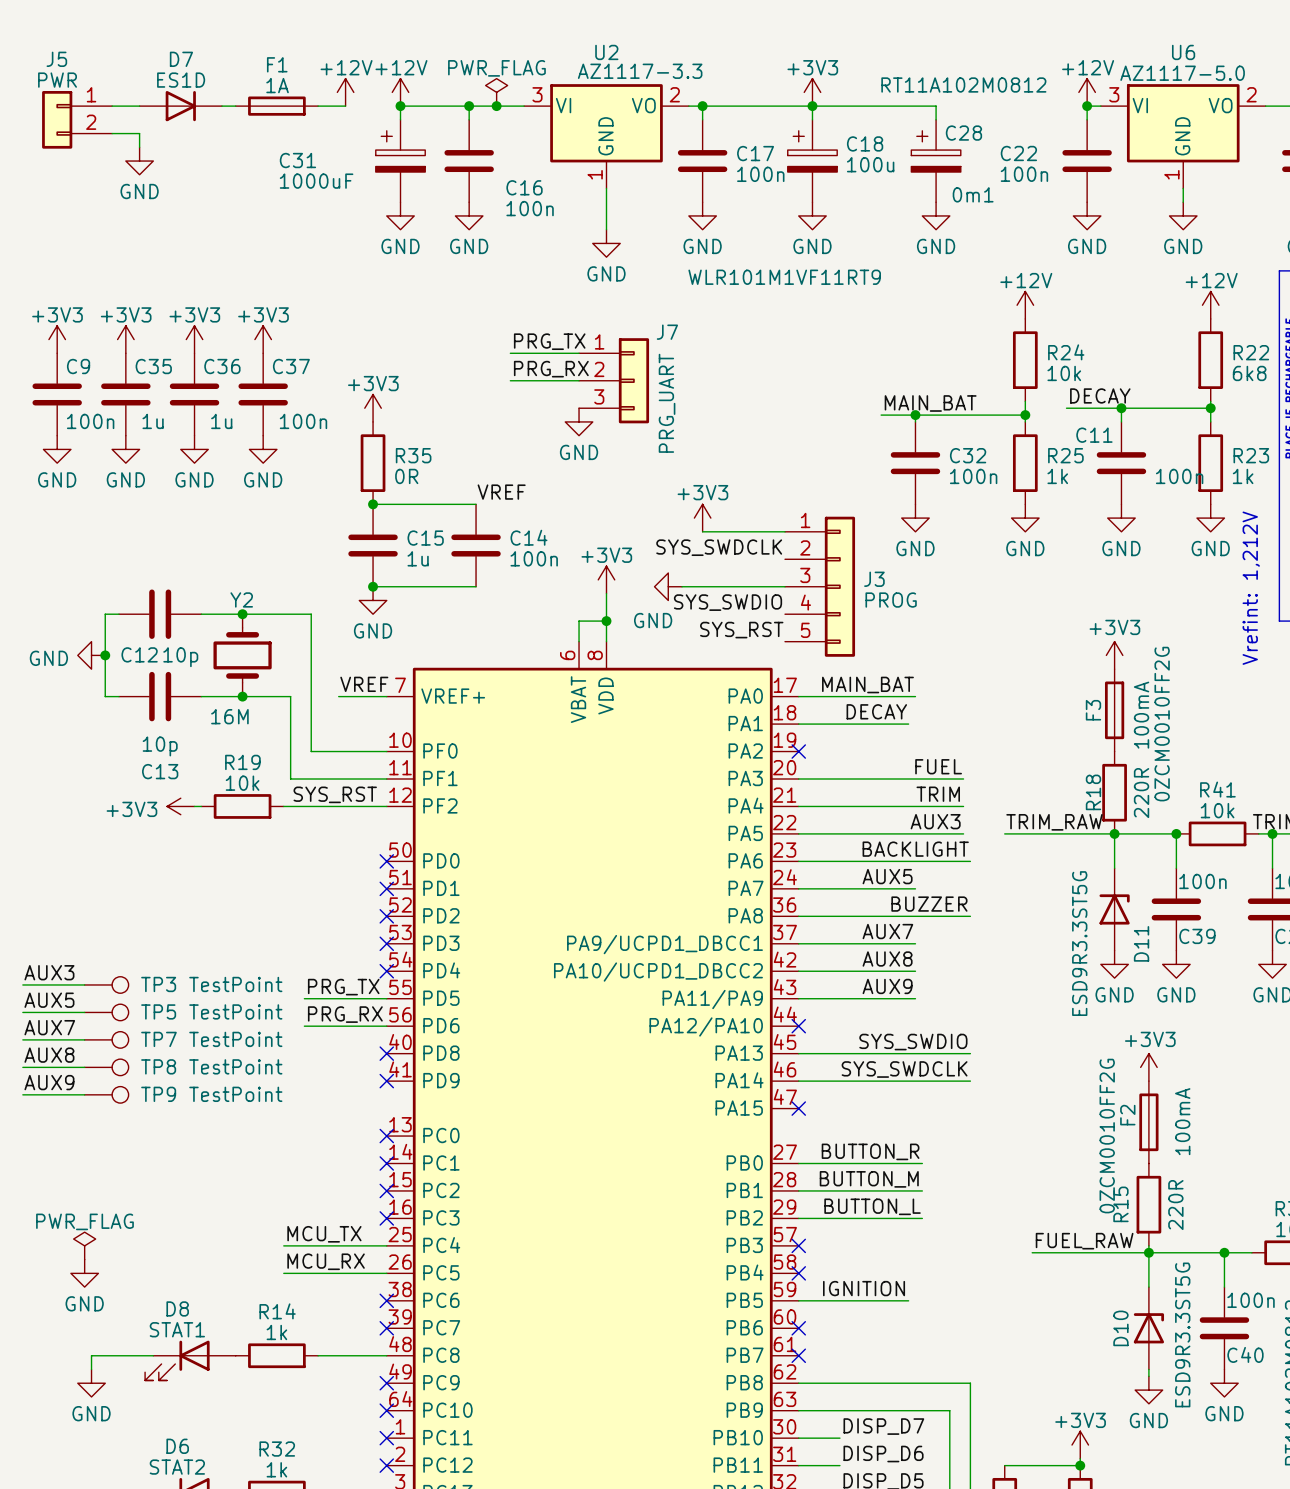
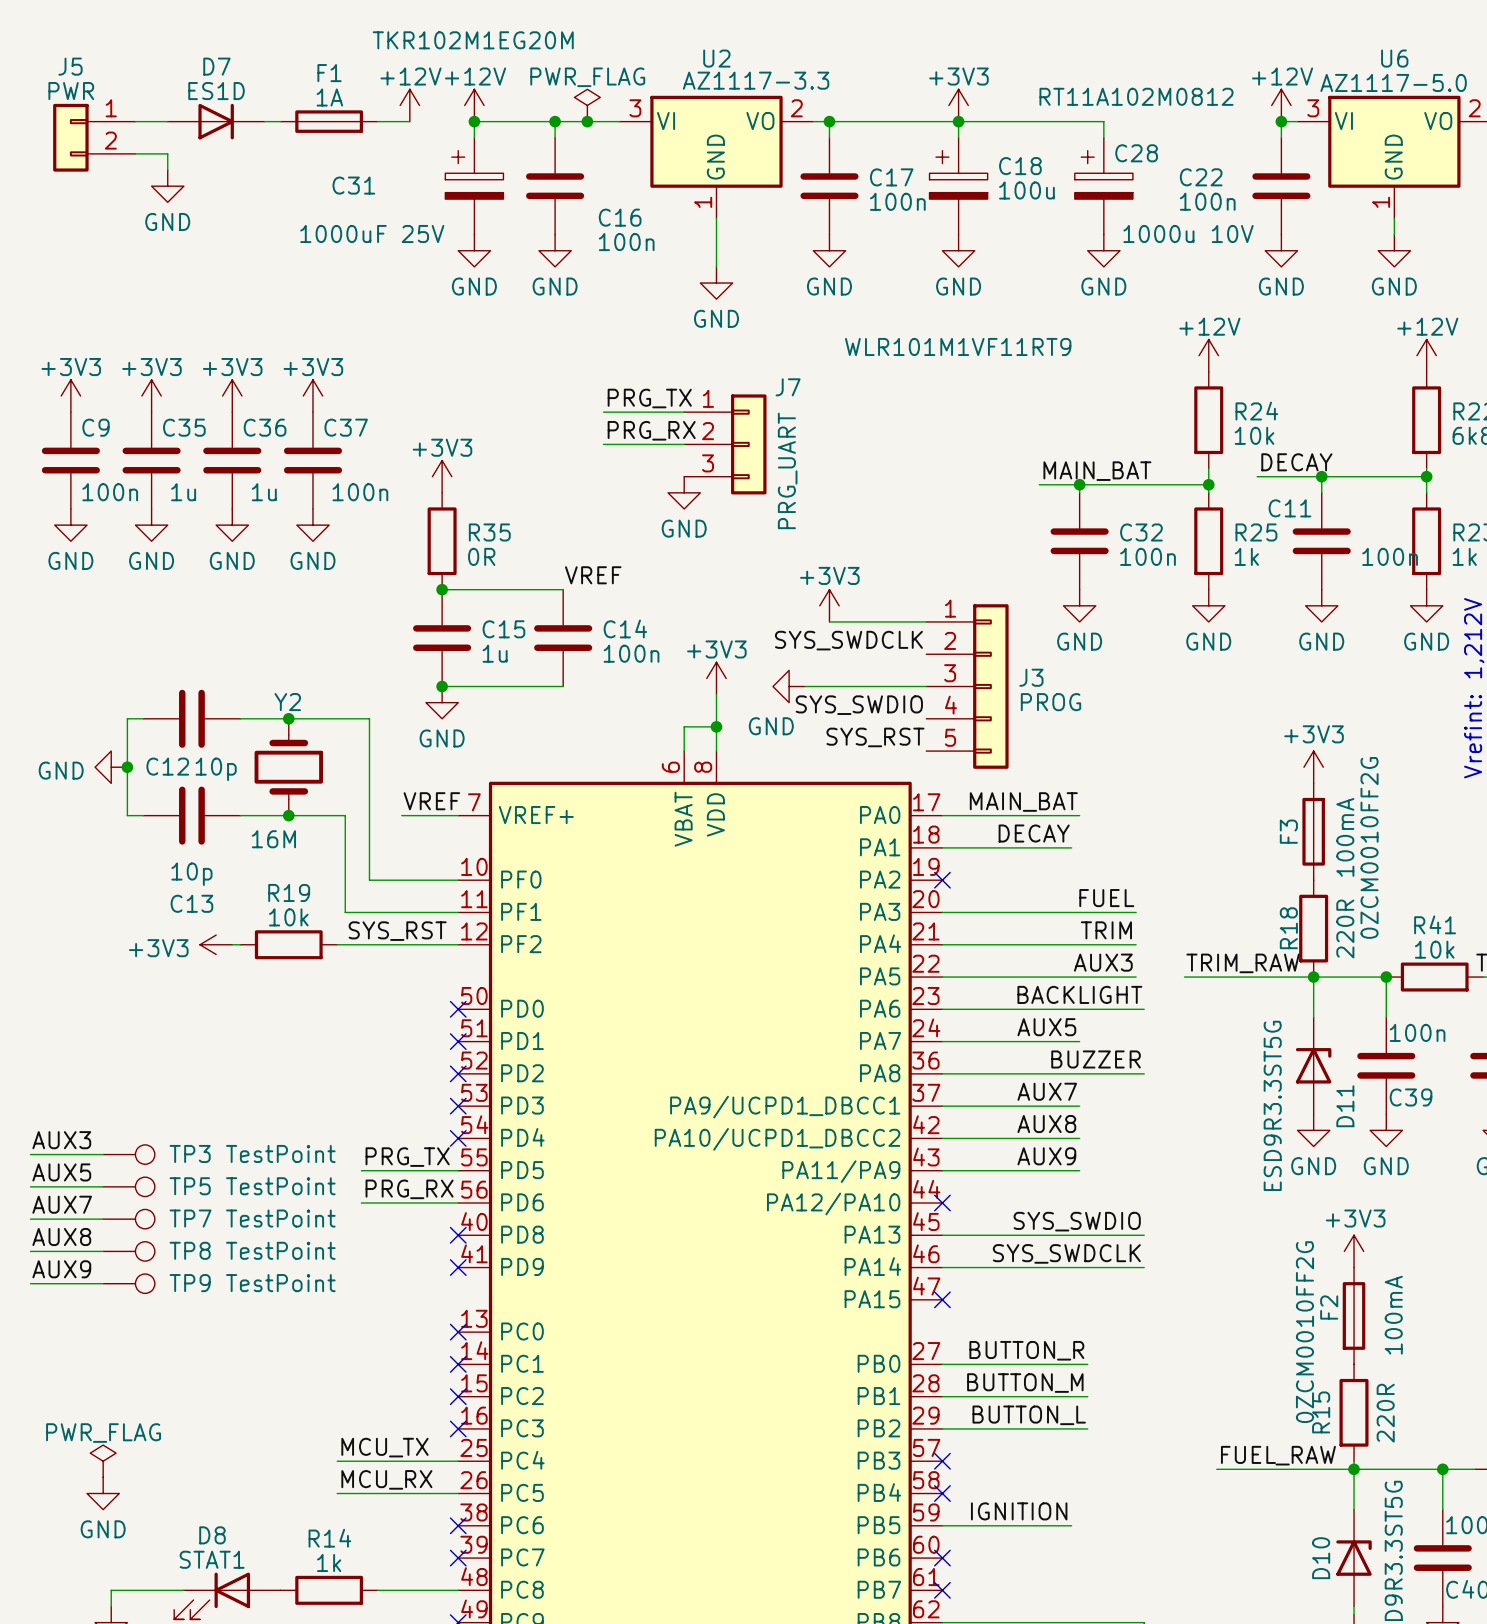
C31 text: none -> TKR102M1EG20M (473, 40)
C31 value: 1000uF (316, 181) -> 1000uF 25V (372, 234)
C28 value: 0m1 (973, 194) -> 1000u 10V (1188, 234)
C18 text position: WLR101M1VF11RT9 (784, 277) -> WLR101M1VF11RT9 (958, 346)

